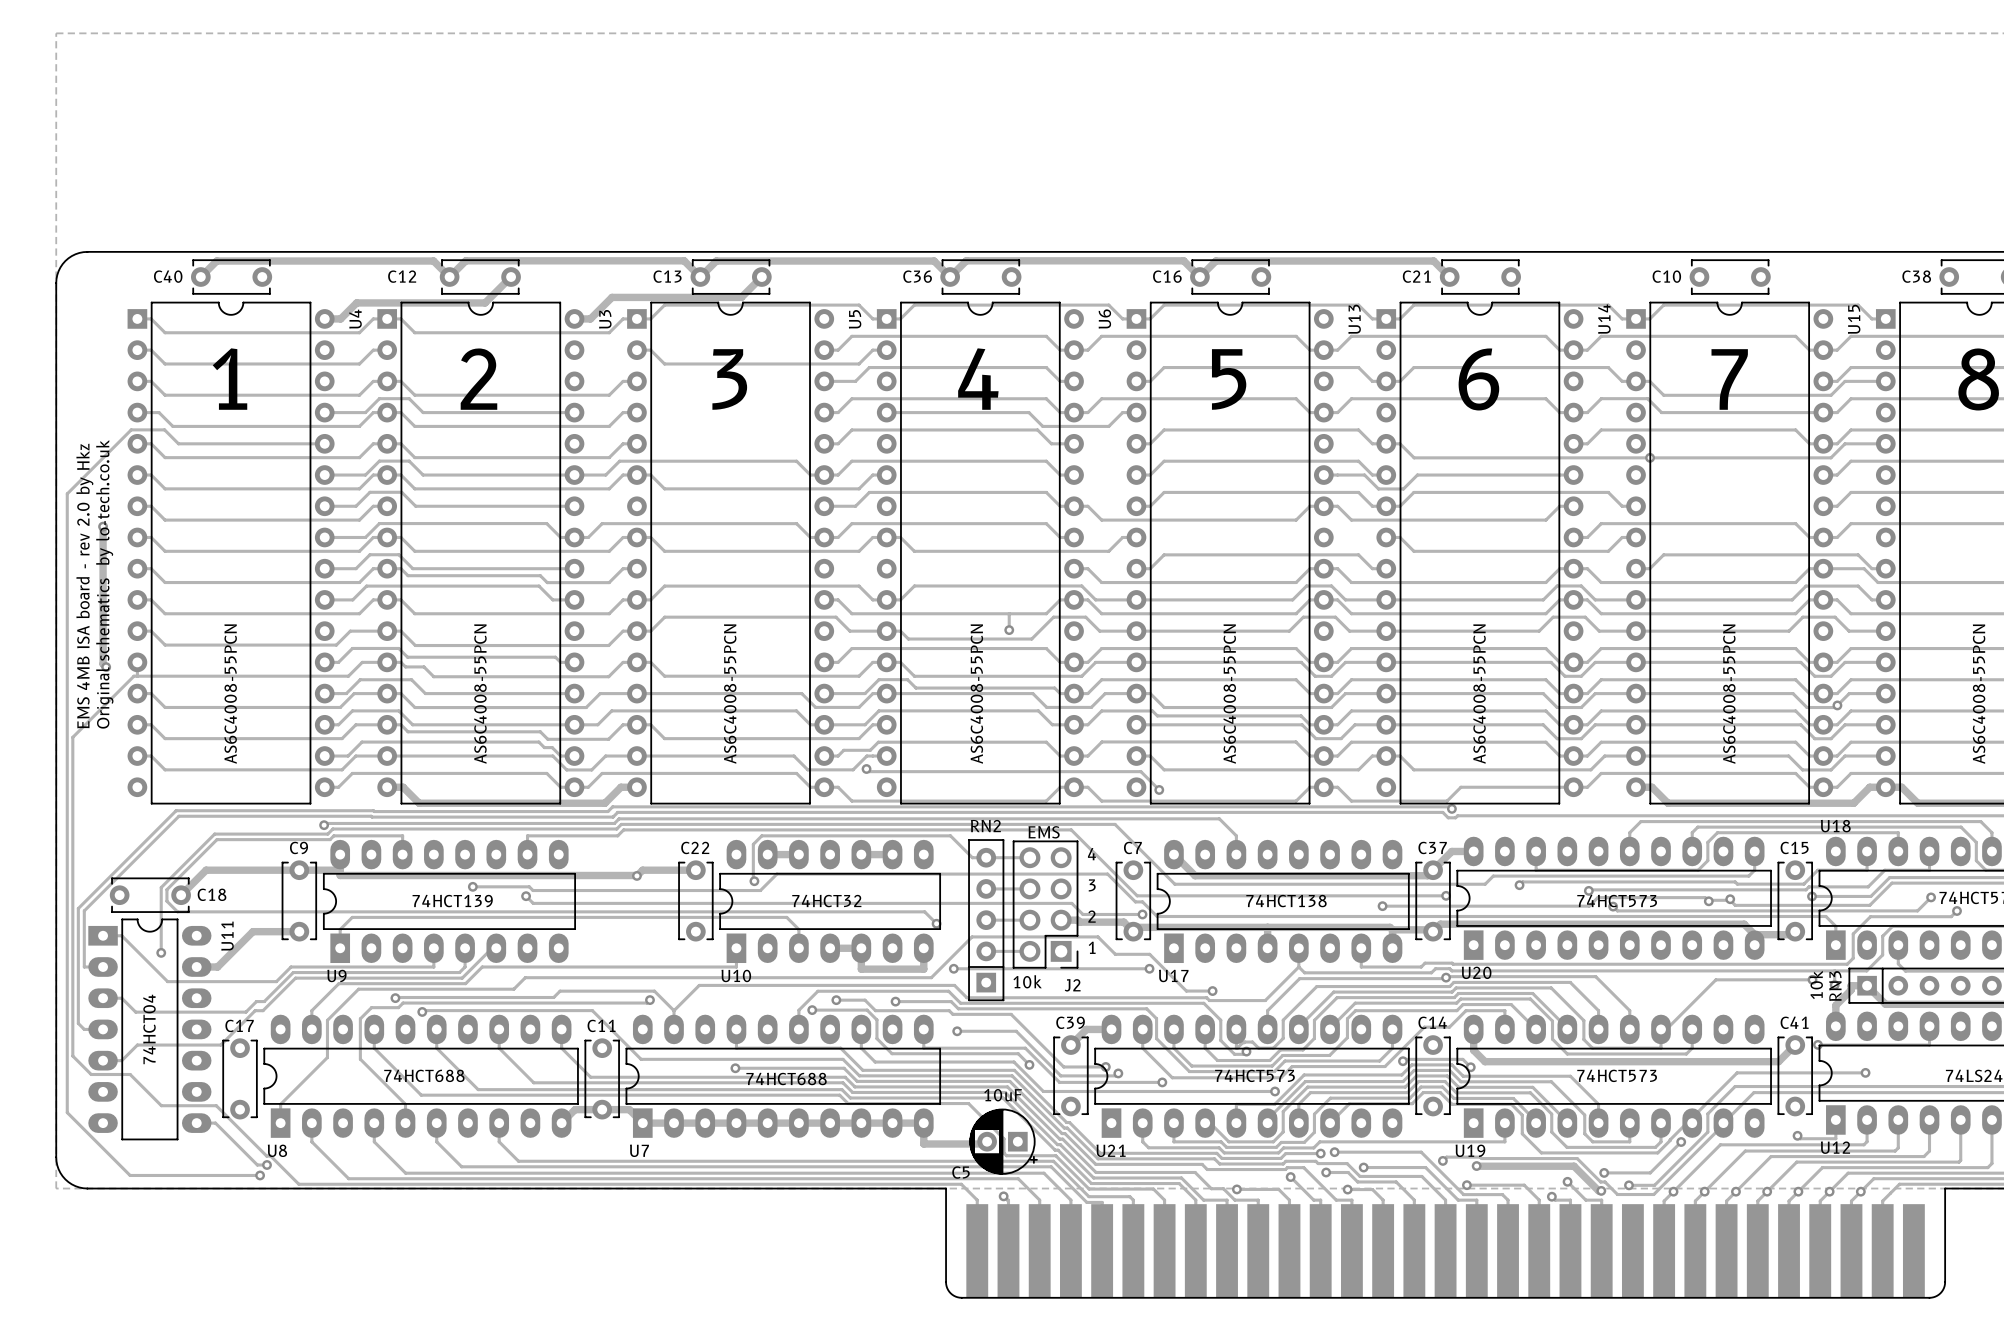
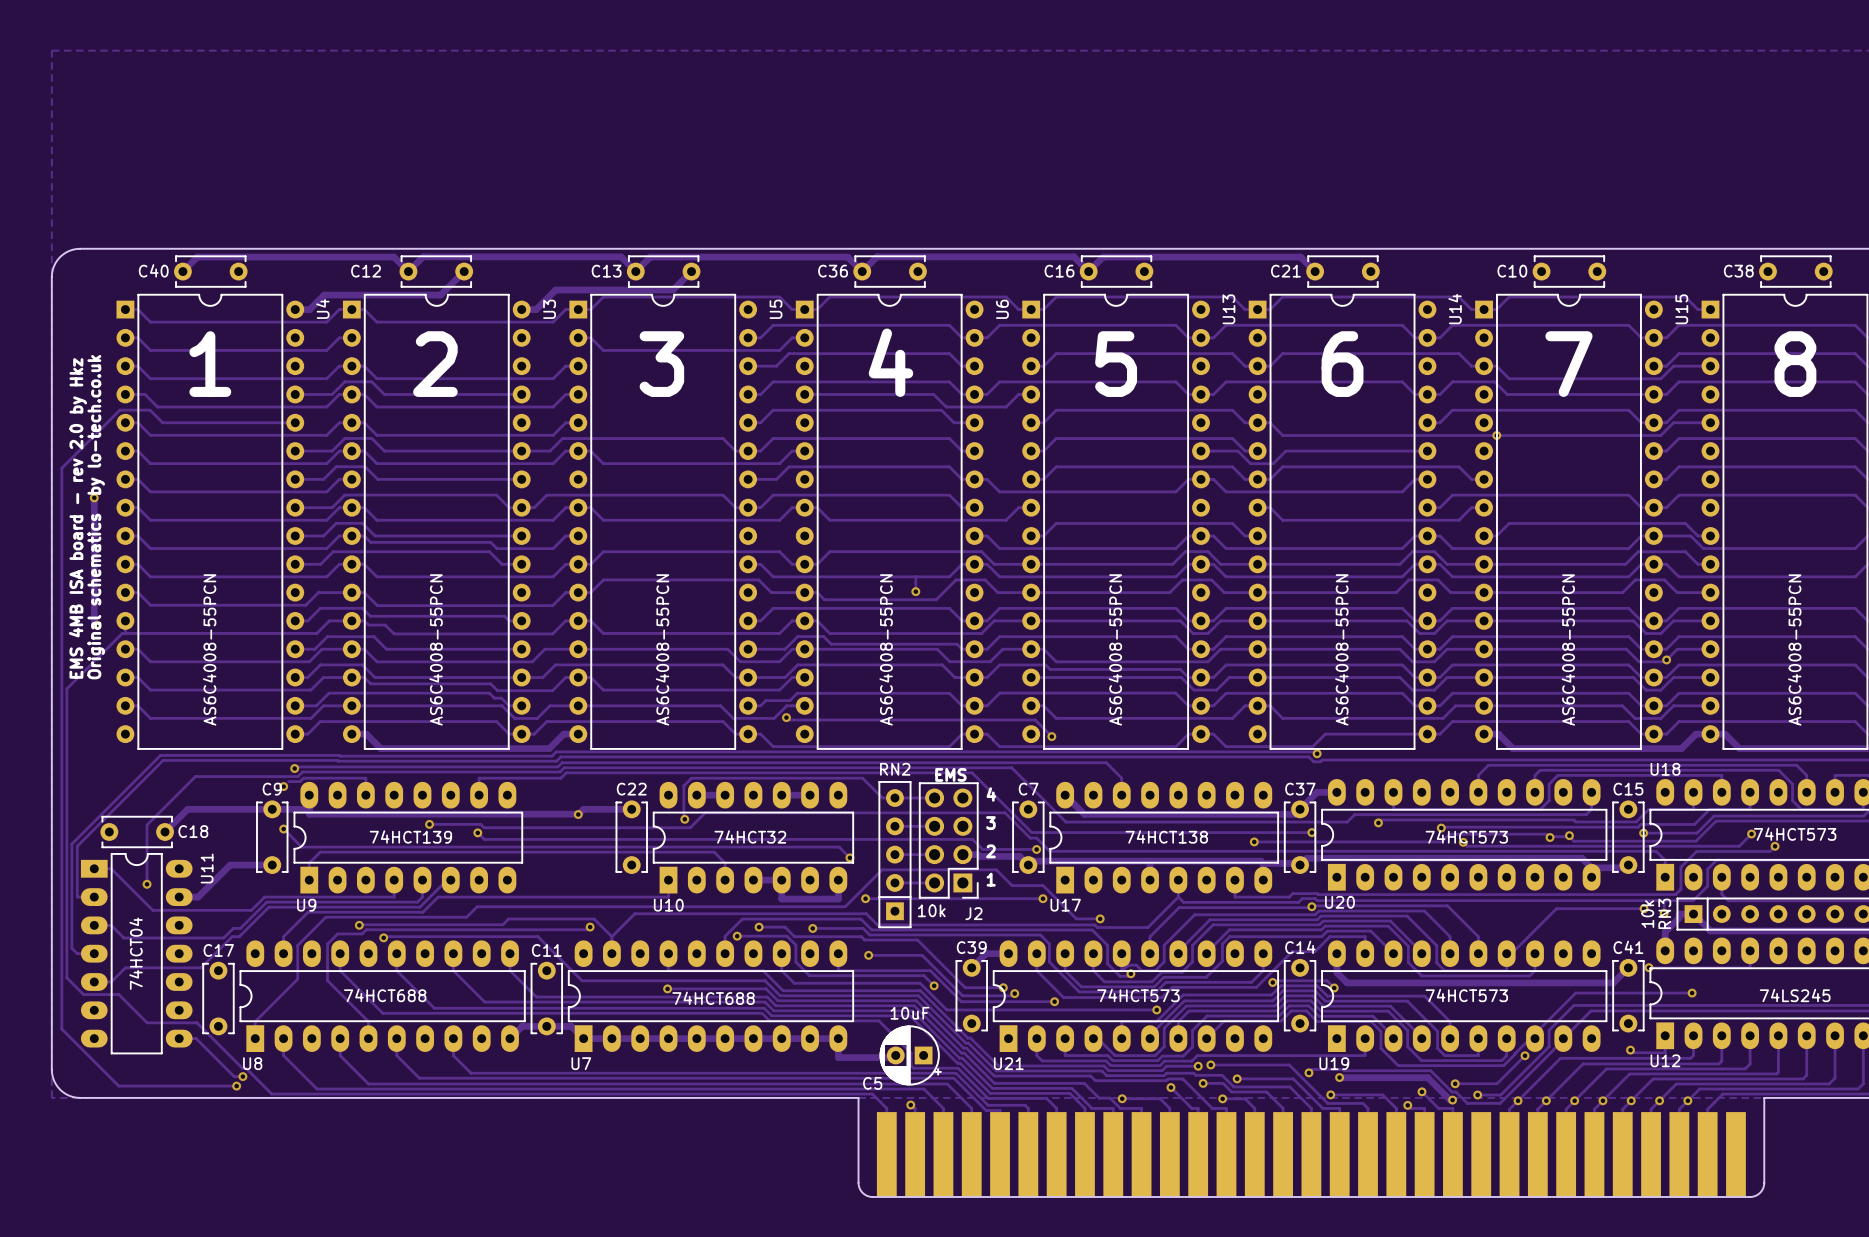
track: (317, 839) (216, 839) (166, 889) (166, 901) (177, 911) (331, 911) -> (283, 829) (301, 847)
via: none -> (283, 786)
via: none -> (283, 829)

